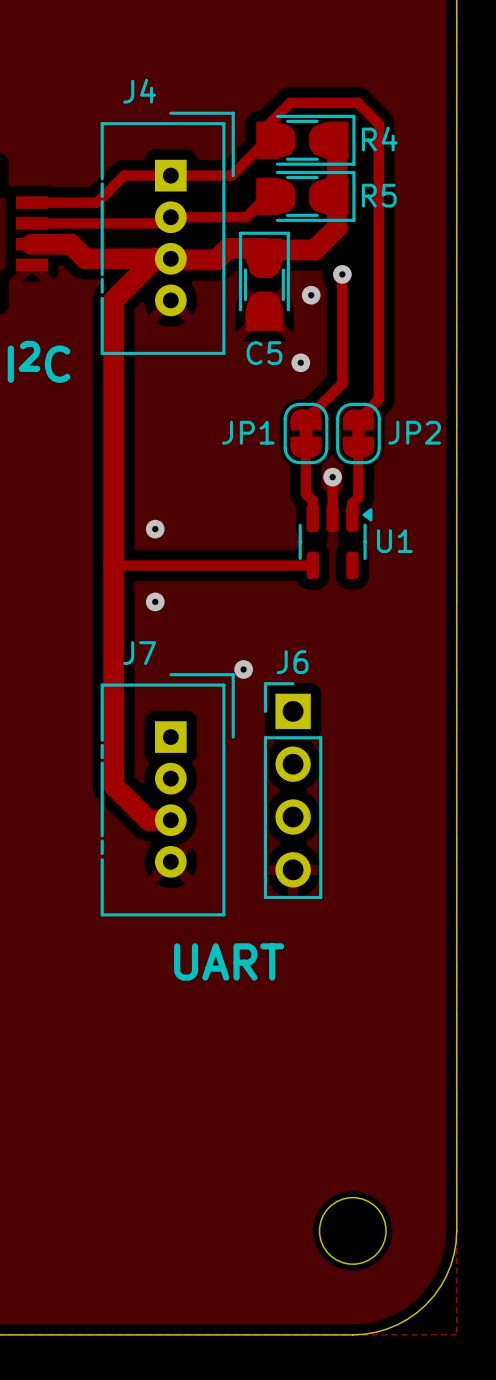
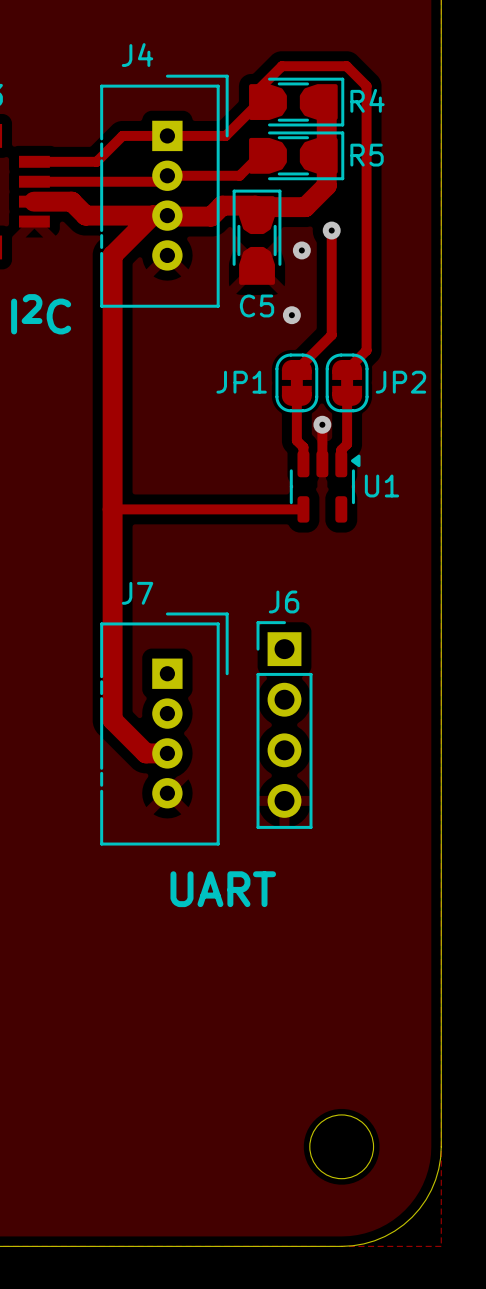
via: (155, 529) -> none
via: (155, 601) -> none
via: (243, 669) -> none

